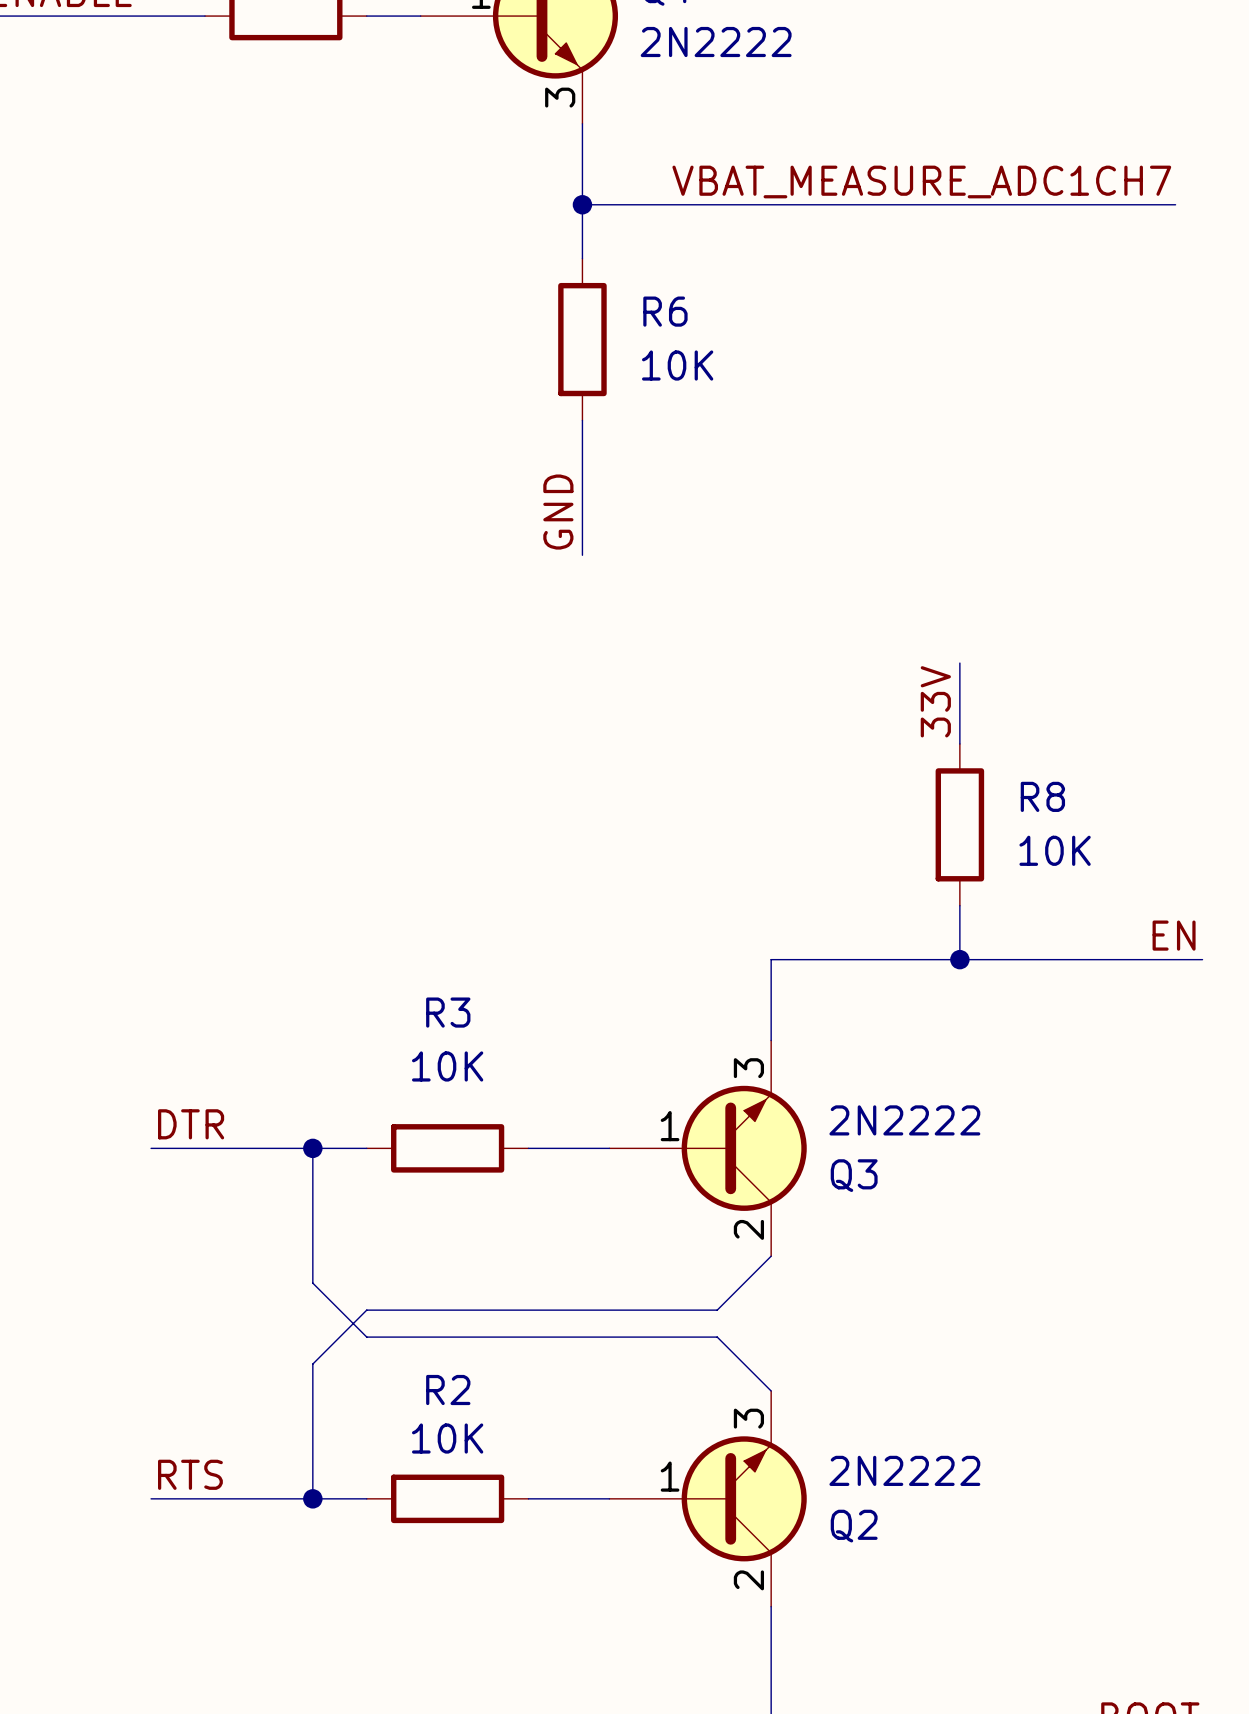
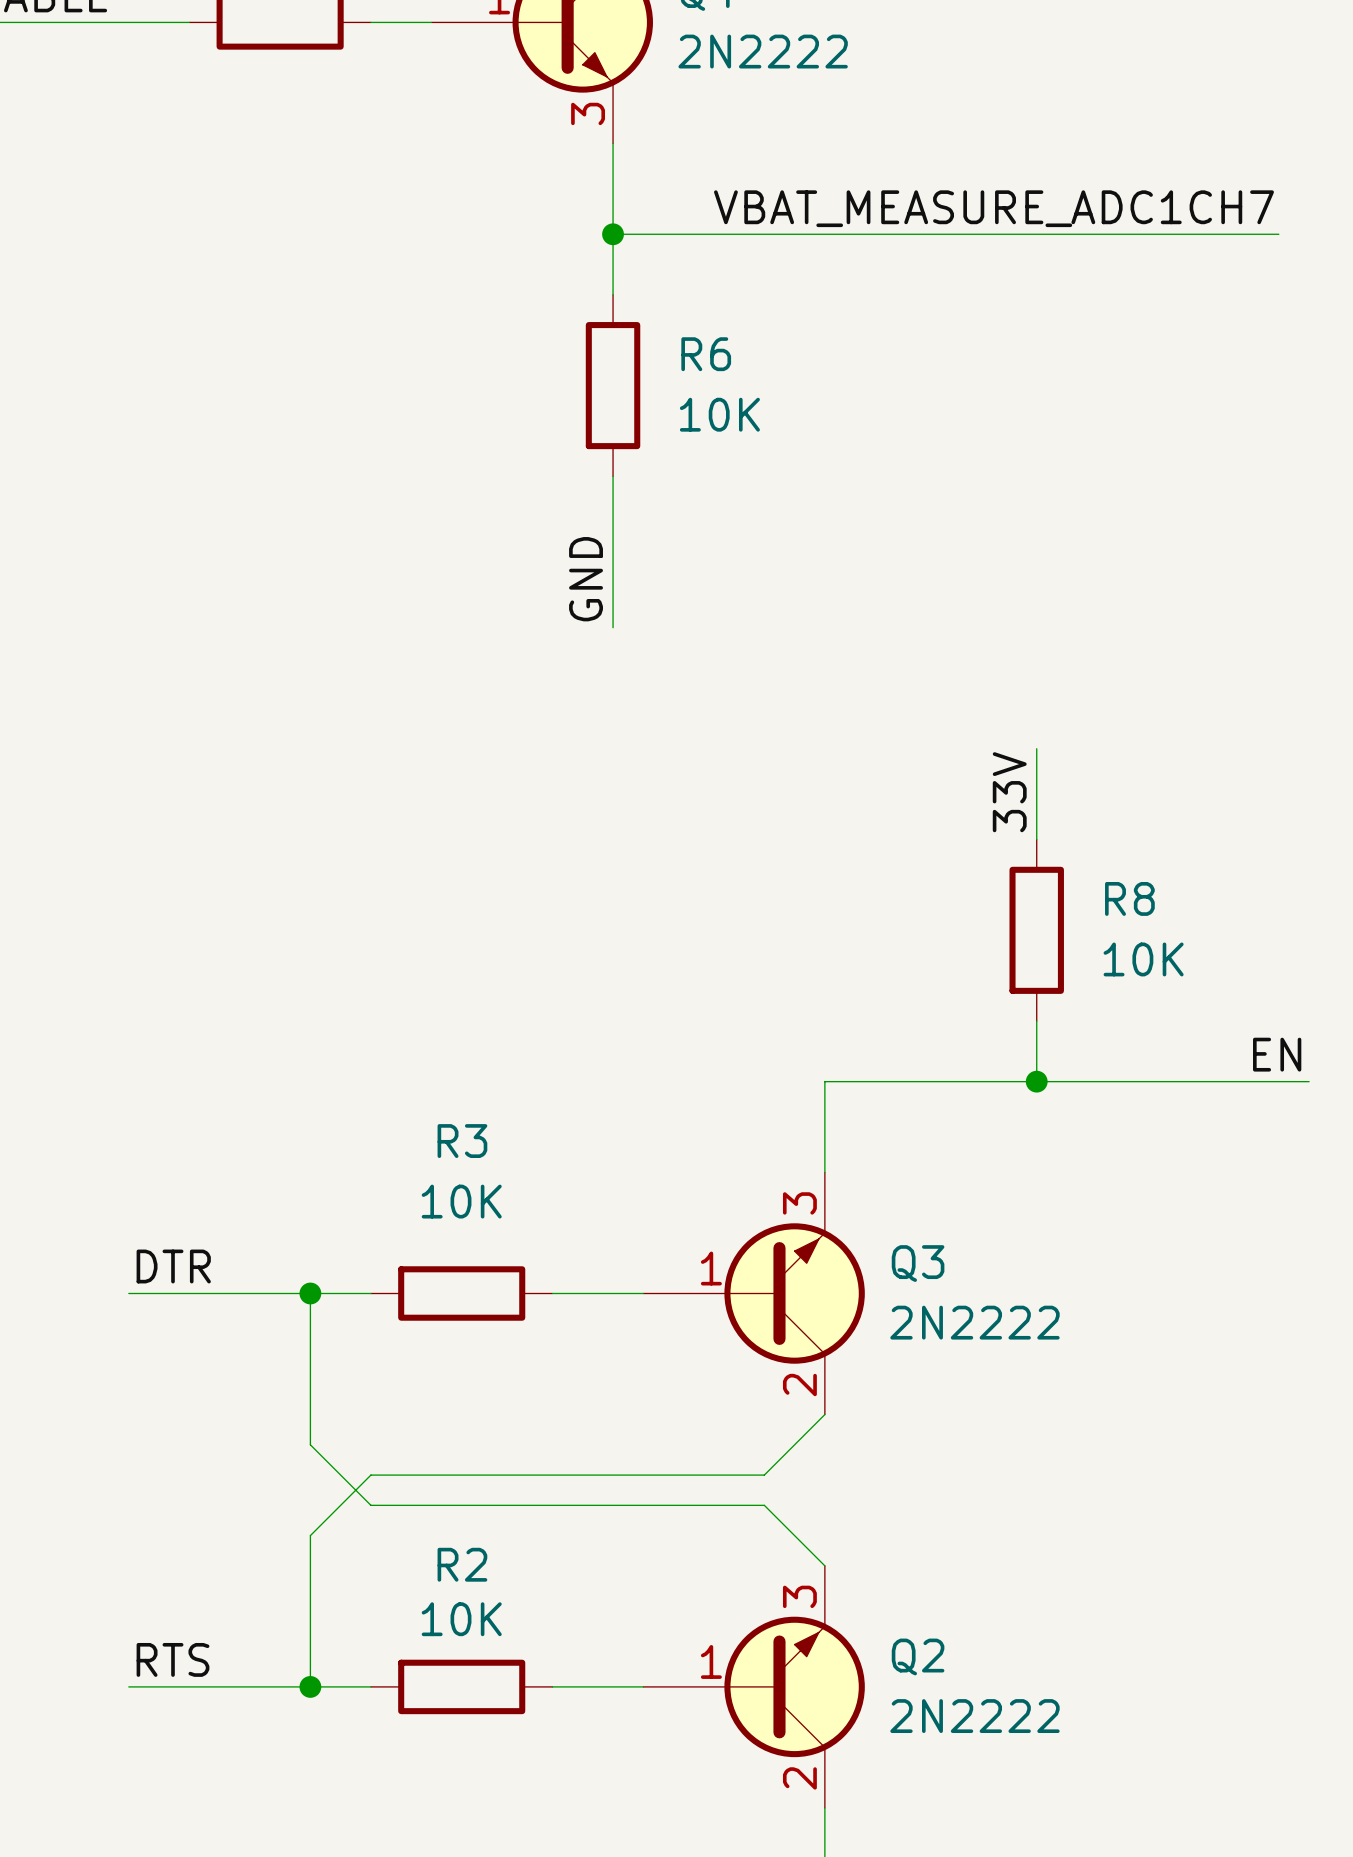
Q3 value position: 2N2222 (904, 1120) -> 2N2222 (974, 1322)
Q3 name position: Q3 (854, 1175) -> Q3 (918, 1263)
Q2 value position: 2N2222 (904, 1470) -> 2N2222 (974, 1716)
Q2 name position: Q2 (854, 1526) -> Q2 (918, 1656)

